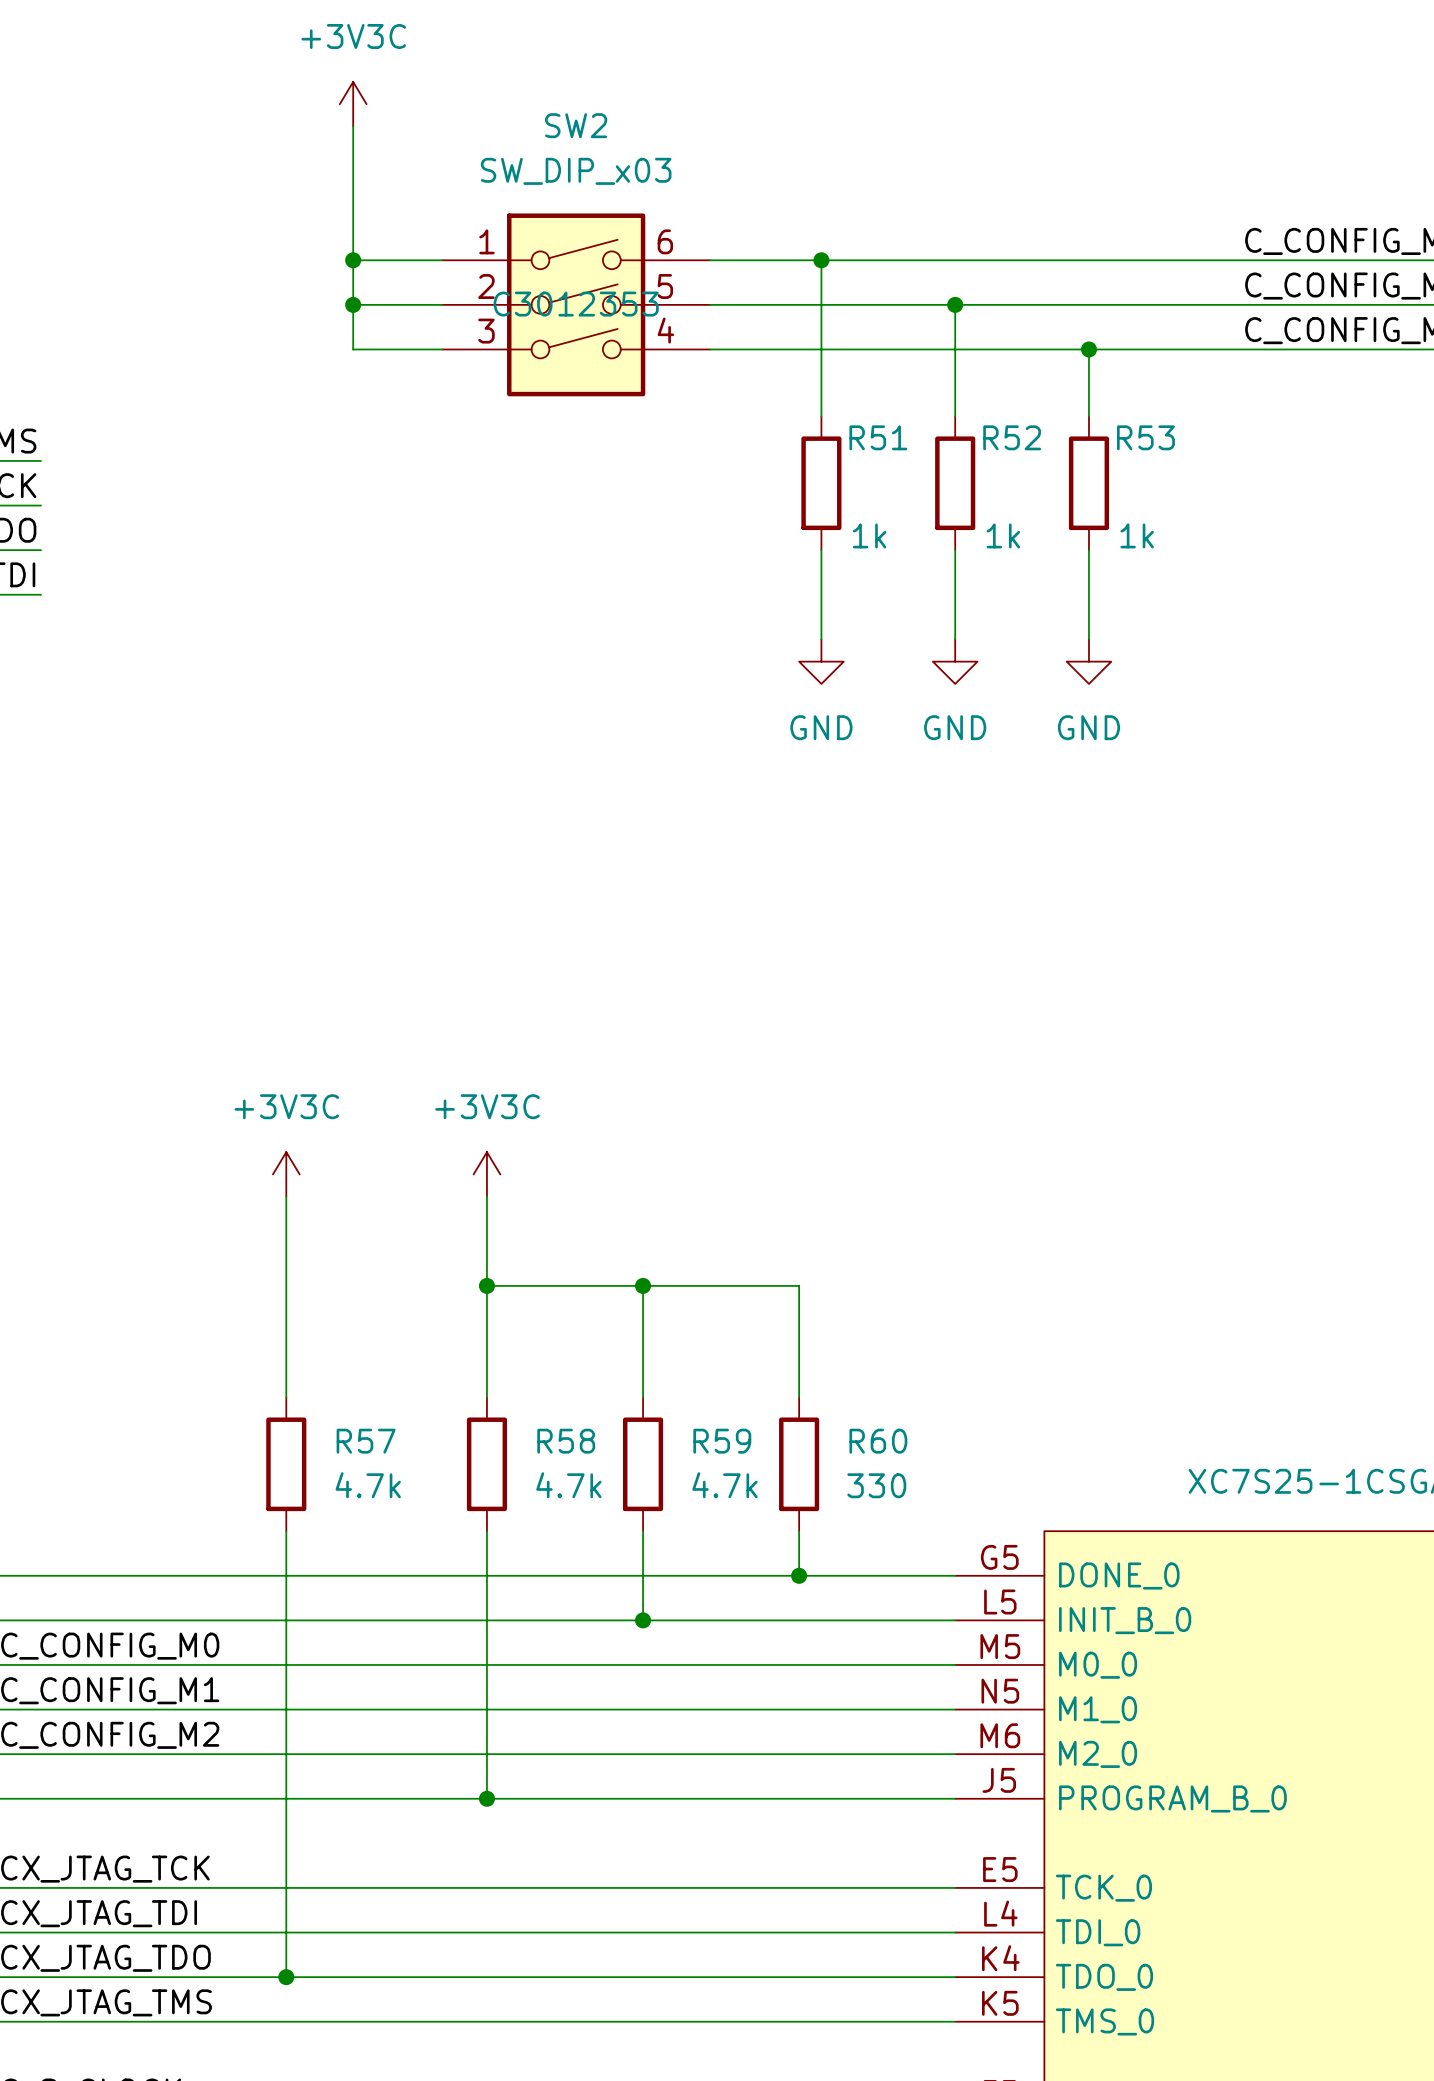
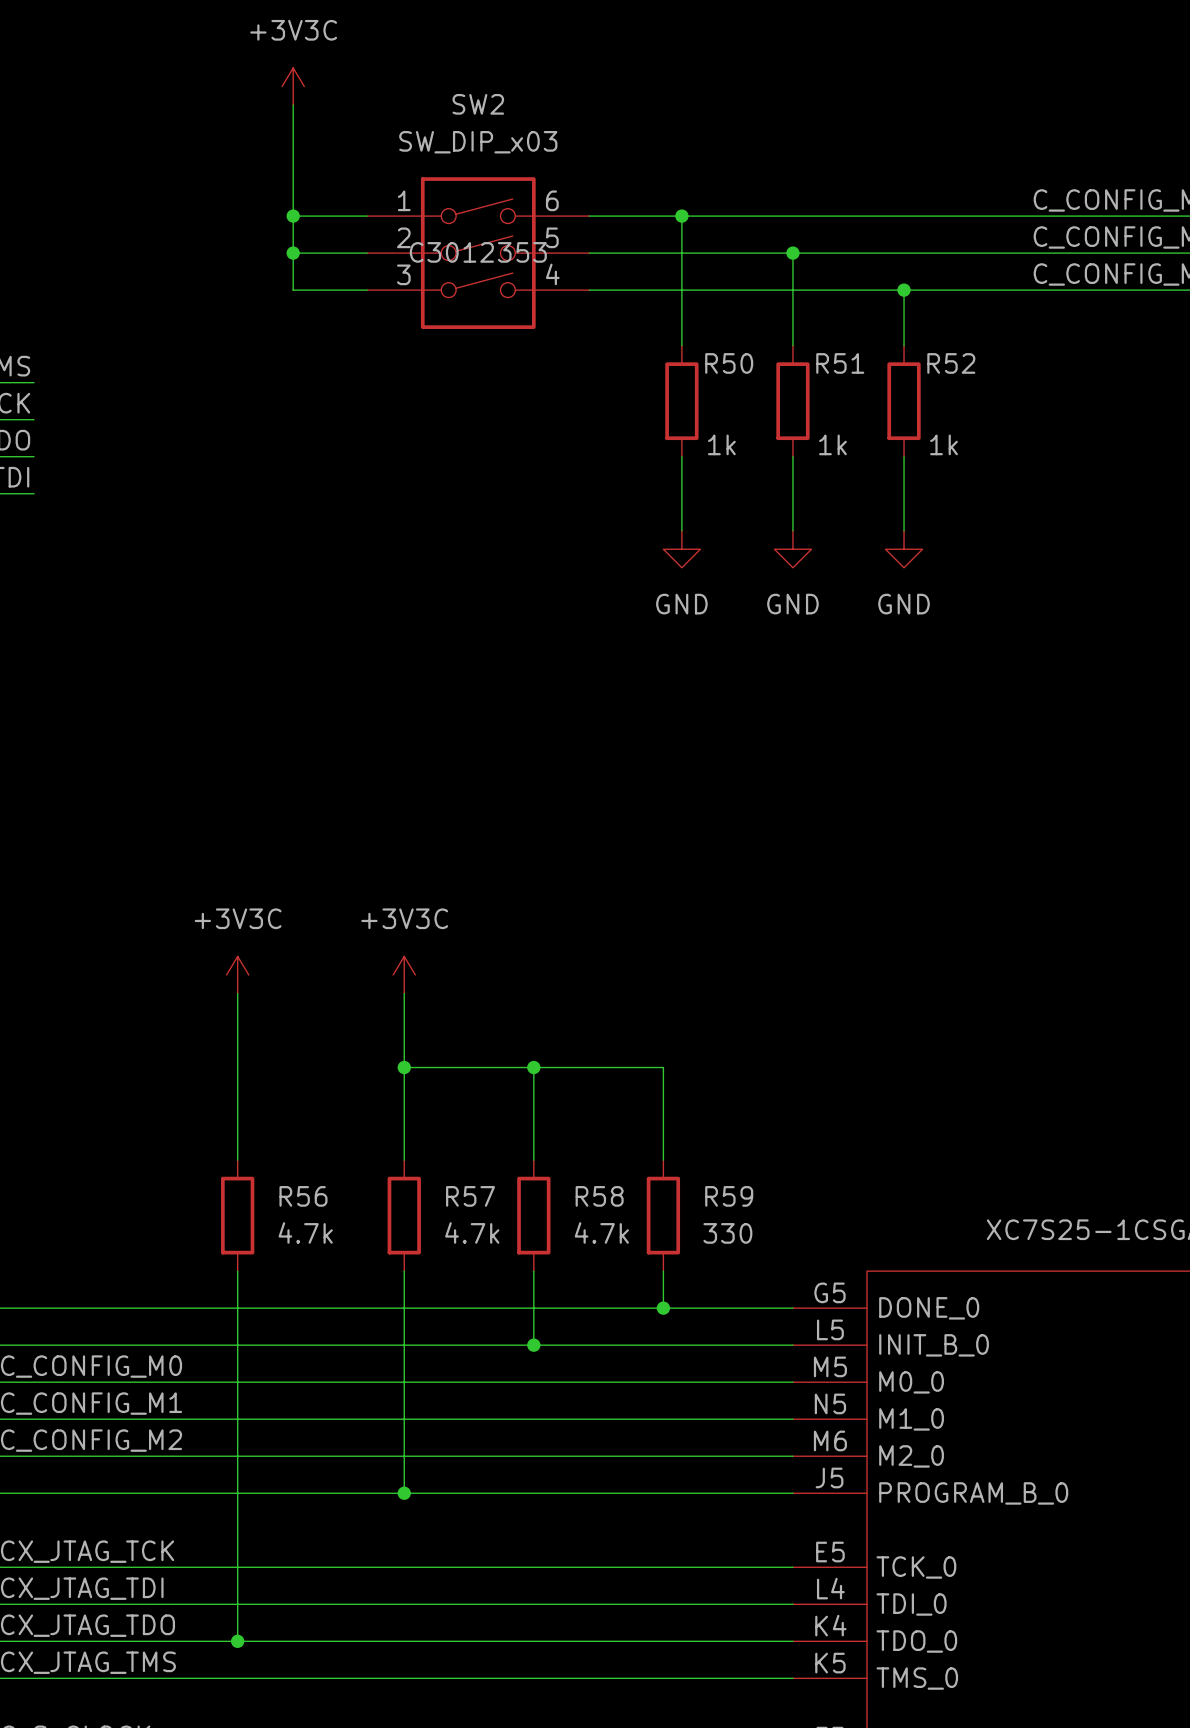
R51 name: R51 (878, 437) -> R50 (729, 363)
R52 name: R52 (1012, 437) -> R51 (840, 363)
R53 name: R53 (1145, 437) -> R52 (951, 363)
R57 name: R57 (366, 1441) -> R56 (303, 1196)
R58 name: R58 (566, 1441) -> R57 (470, 1196)
R59 name: R59 (722, 1441) -> R58 (599, 1196)
R60 name: R60 (878, 1441) -> R59 (729, 1196)

